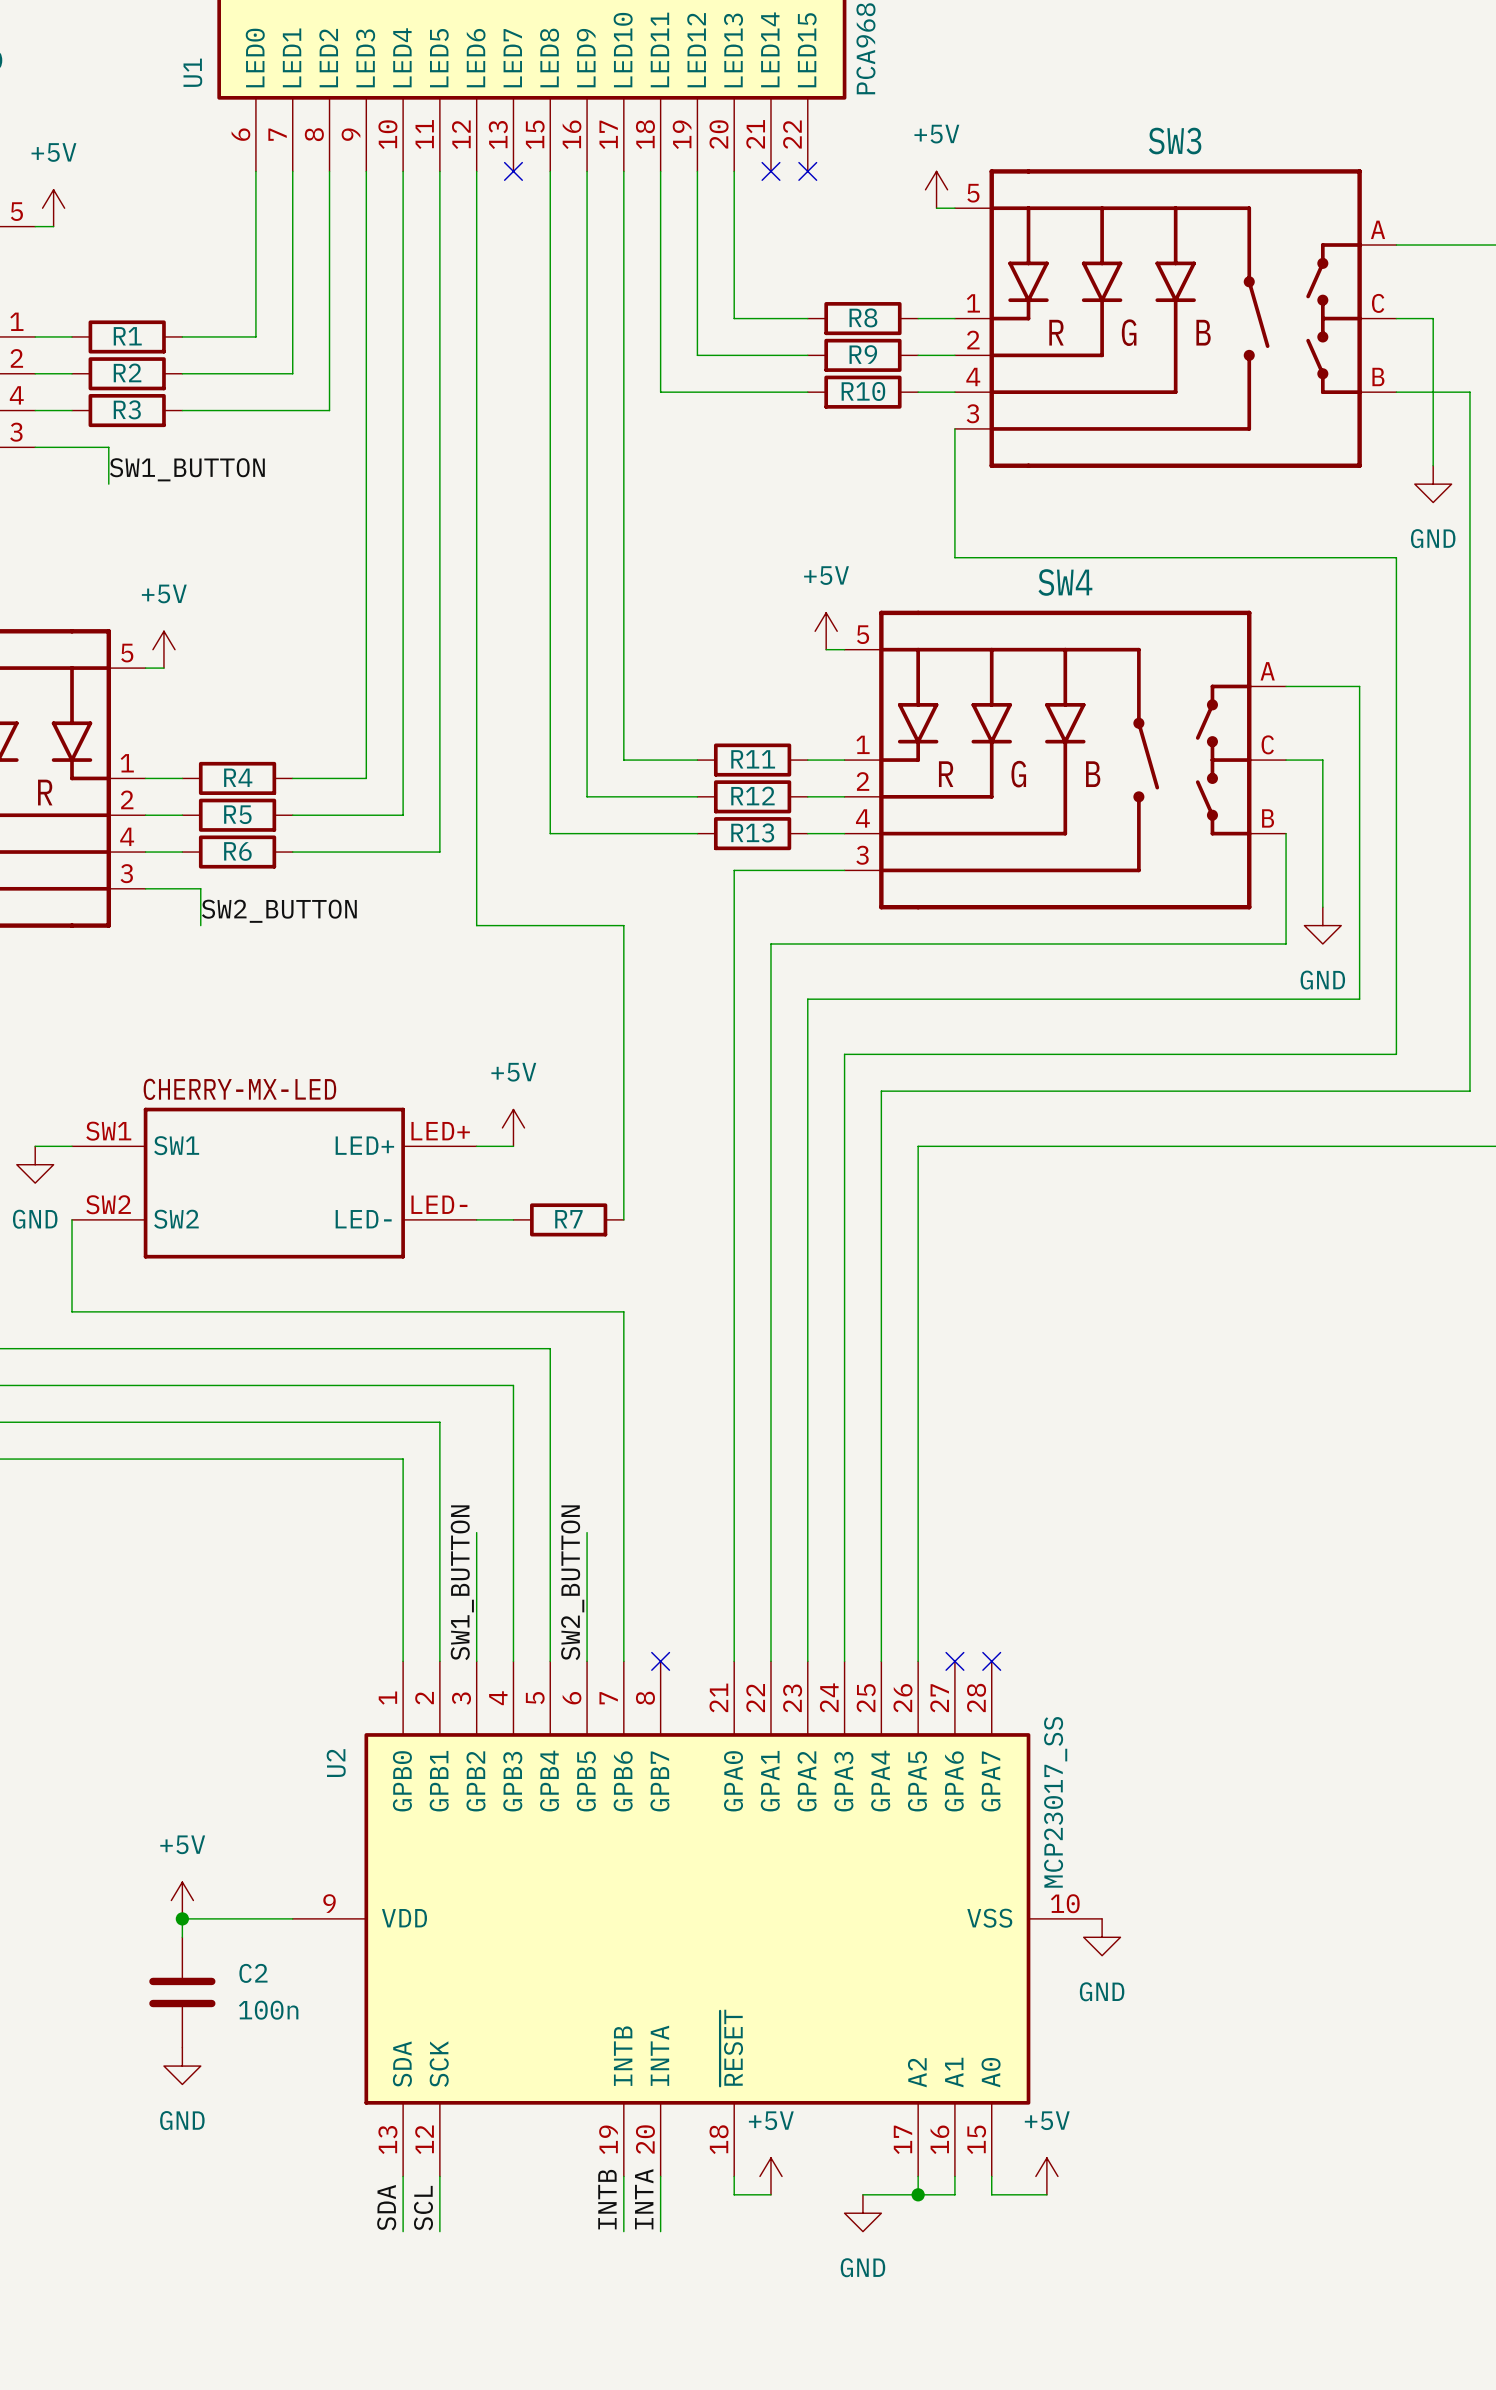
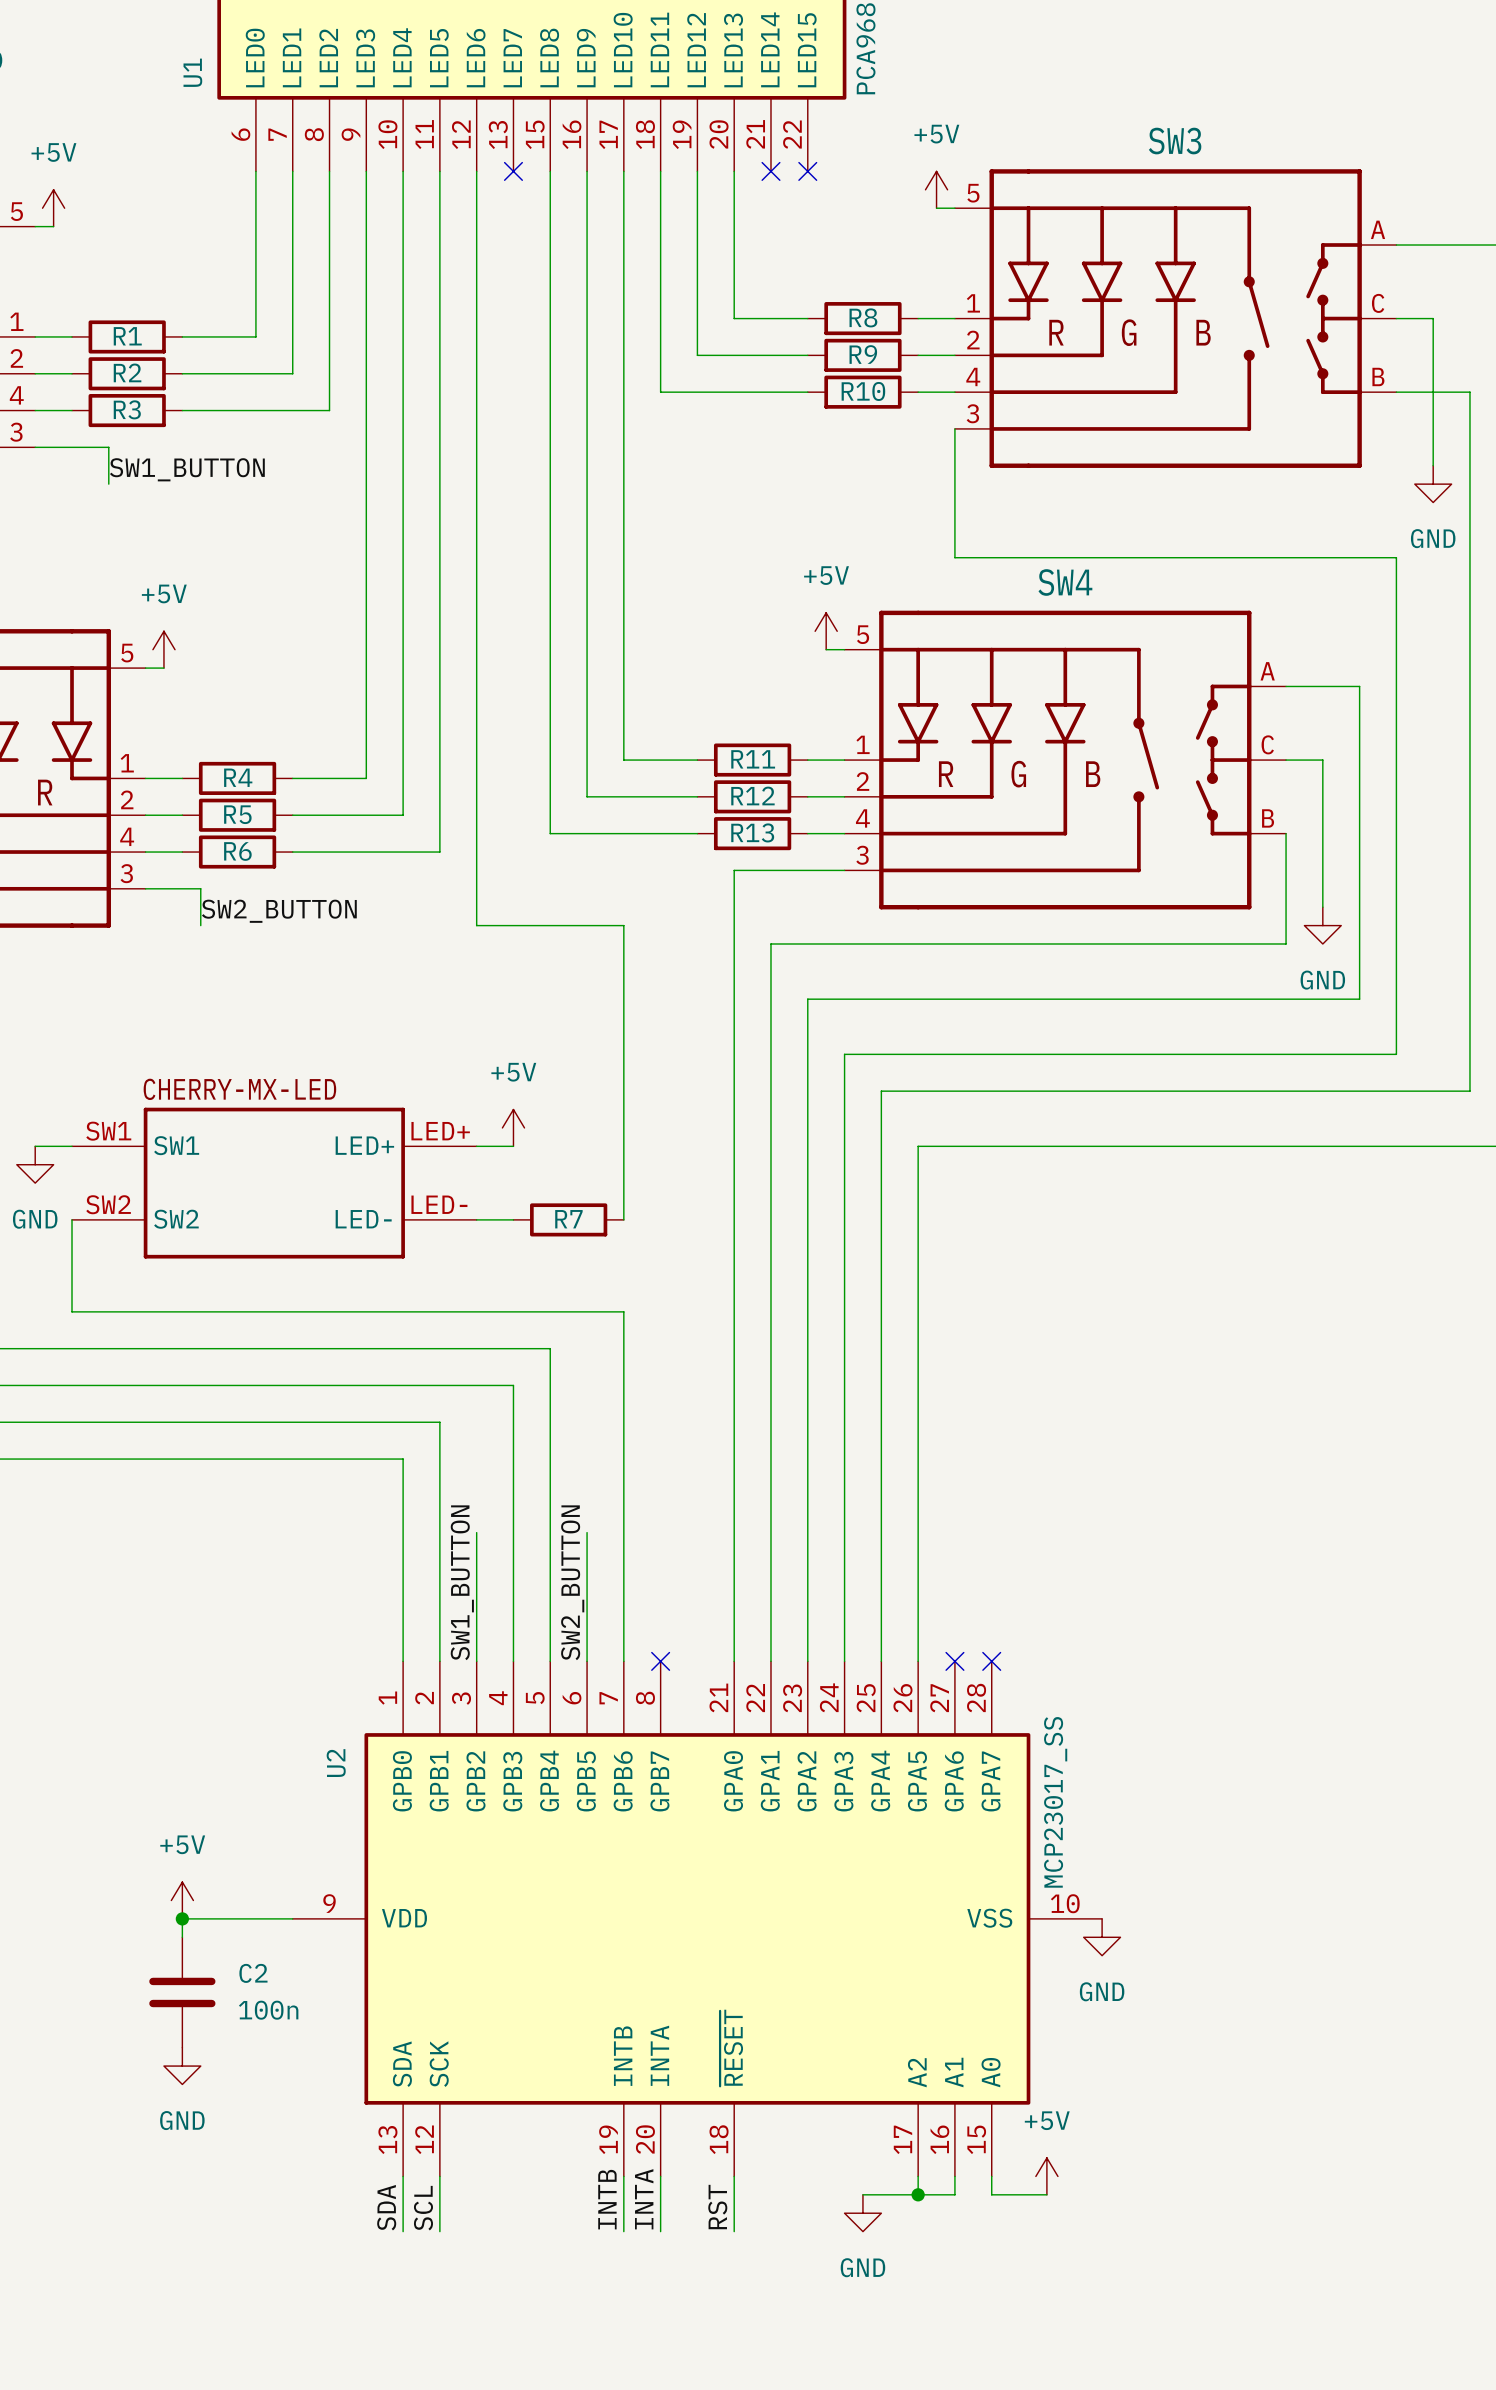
power symbol: +5V (770, 2176) -> none
wire: (734, 2194) (770, 2194) -> (734, 2194) (734, 2231)
label: none -> RST (717, 2207)

